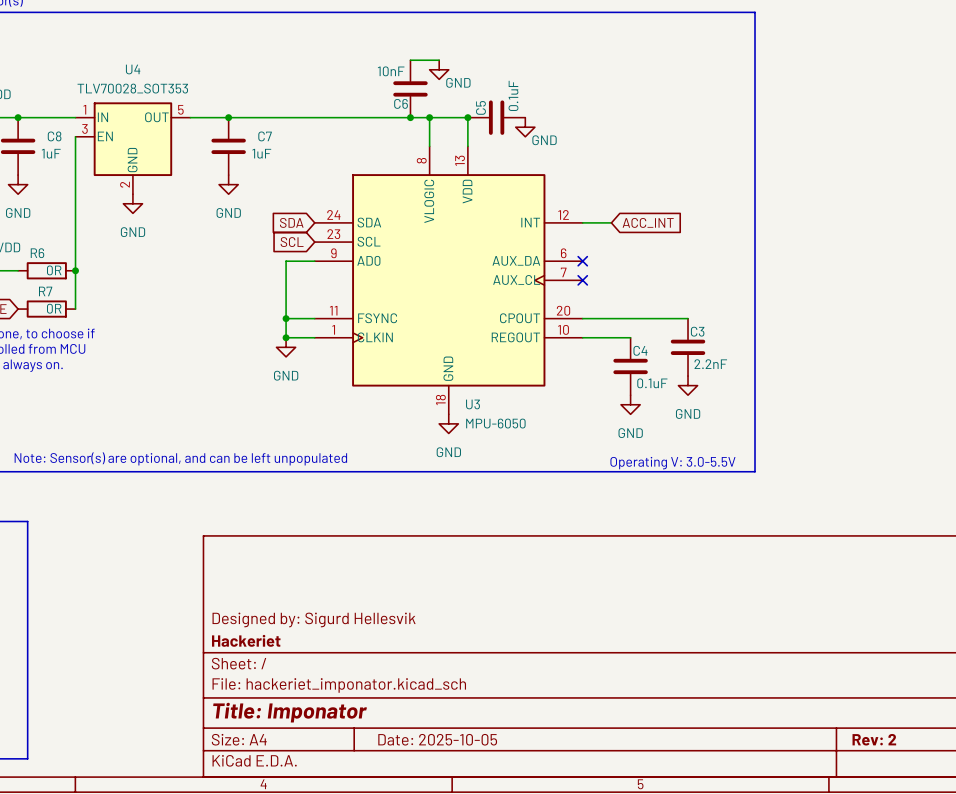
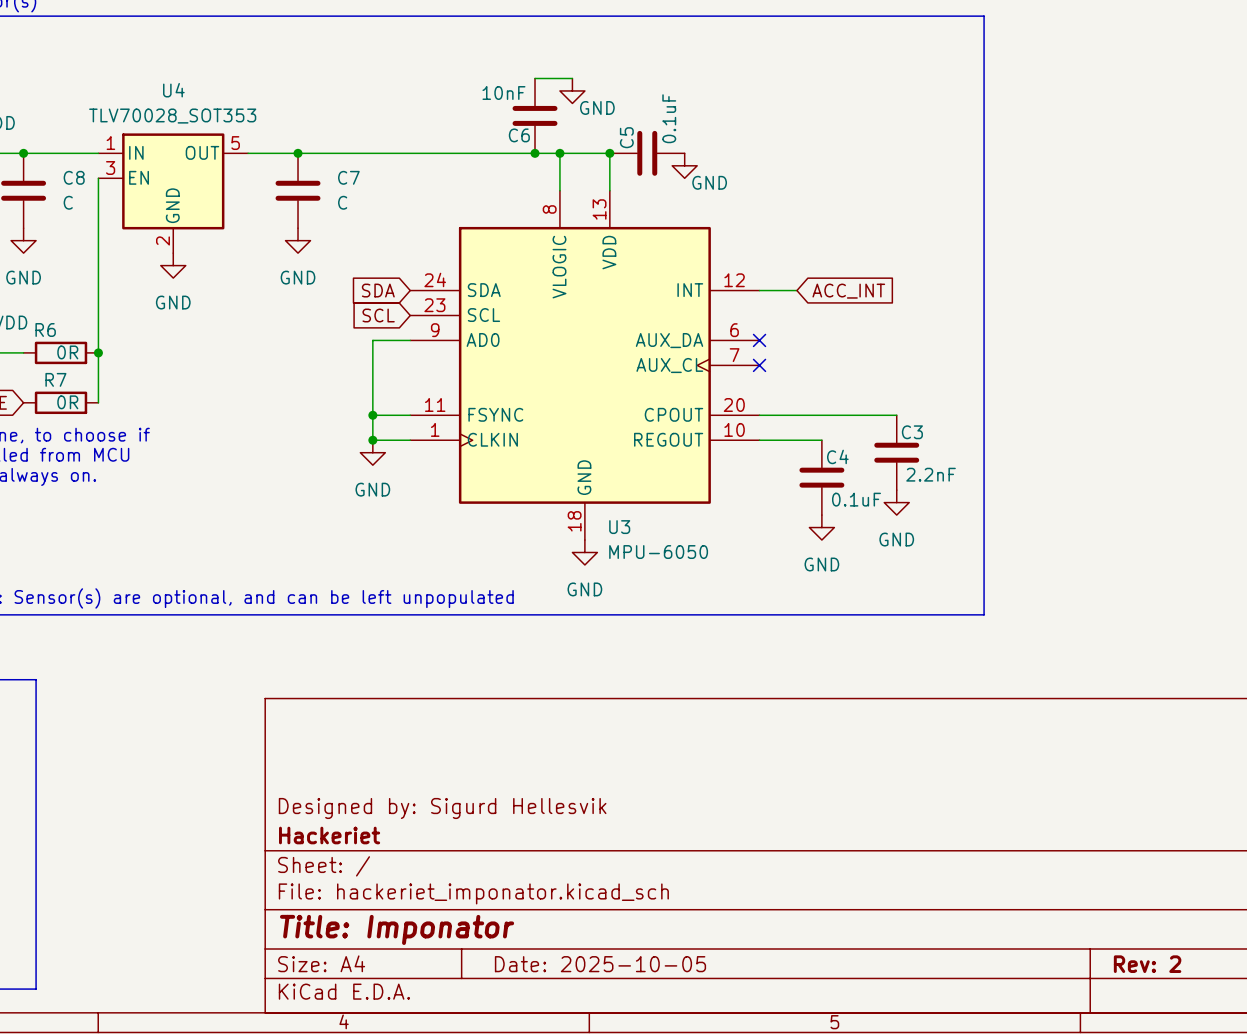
C8 value: 1uF (51, 153) -> C (68, 202)
C7 value: 1uF (261, 153) -> C (342, 202)
text: Operating V: 3.0-5.5V (672, 463) -> none

